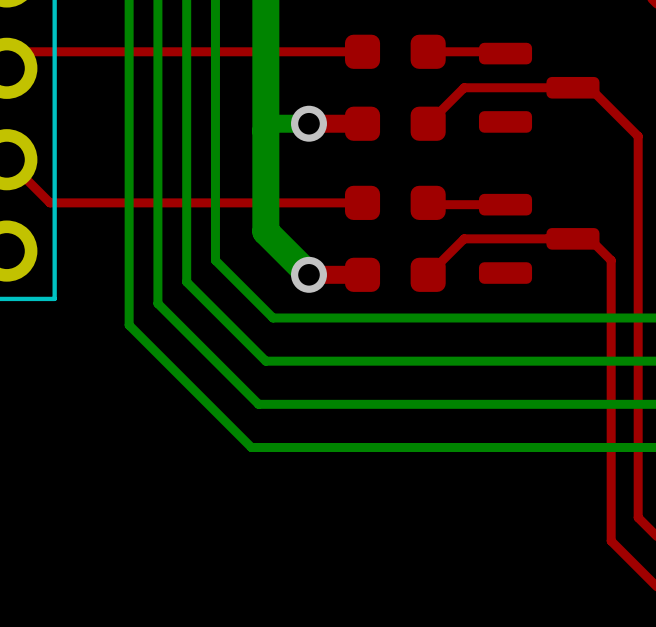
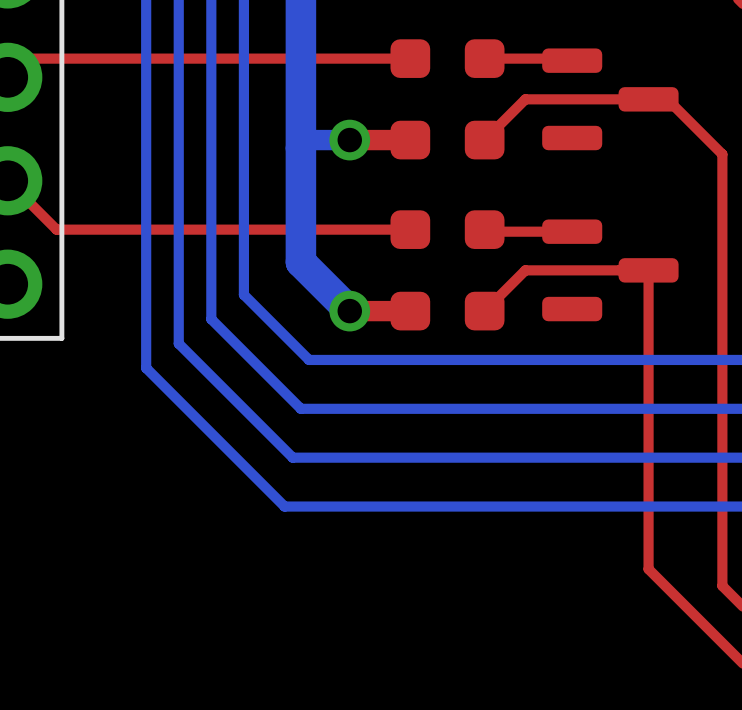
top track: (589, 238) (611, 260) (611, 541) -> (648, 270) (648, 569) (691, 612)

